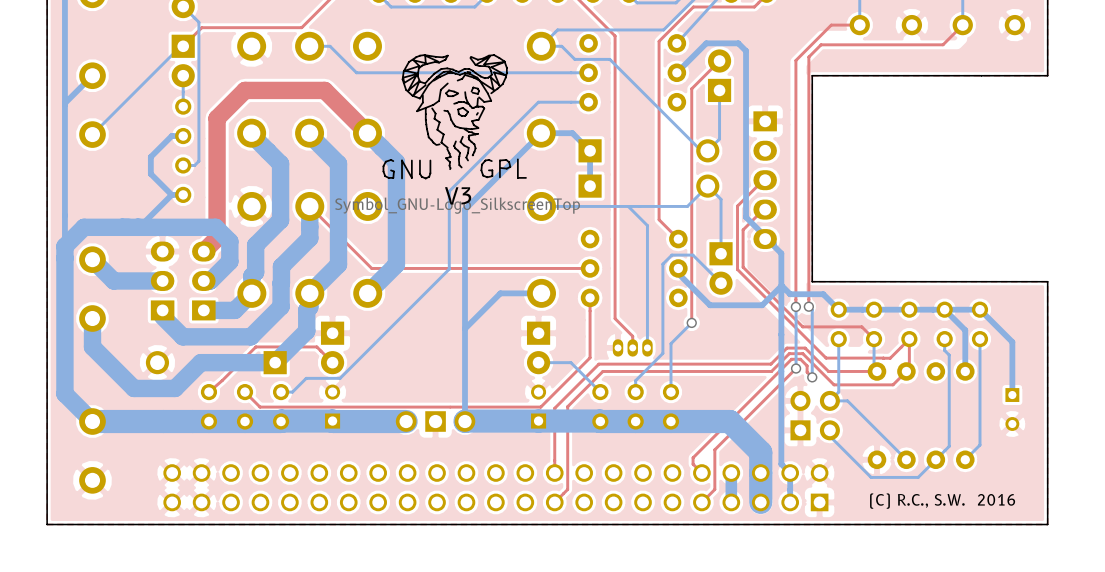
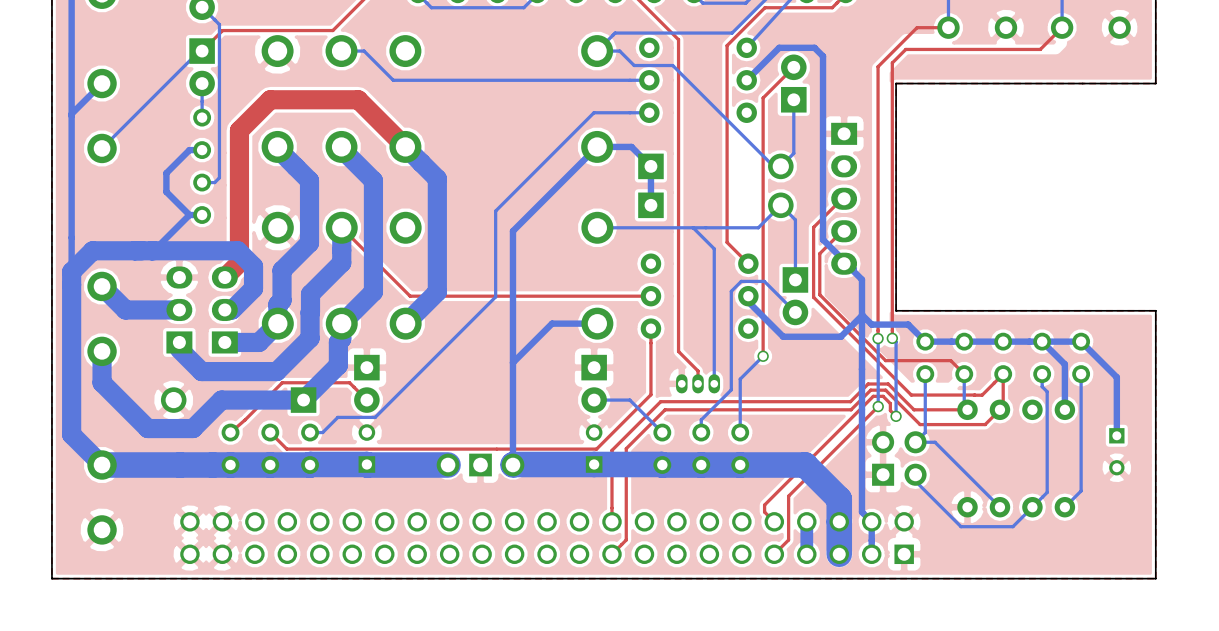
drawing: [382, 54, 527, 180] -> none
text: V3 (458, 195) -> none
text: (C) R.C., S.W. 2016 (942, 501) -> none

